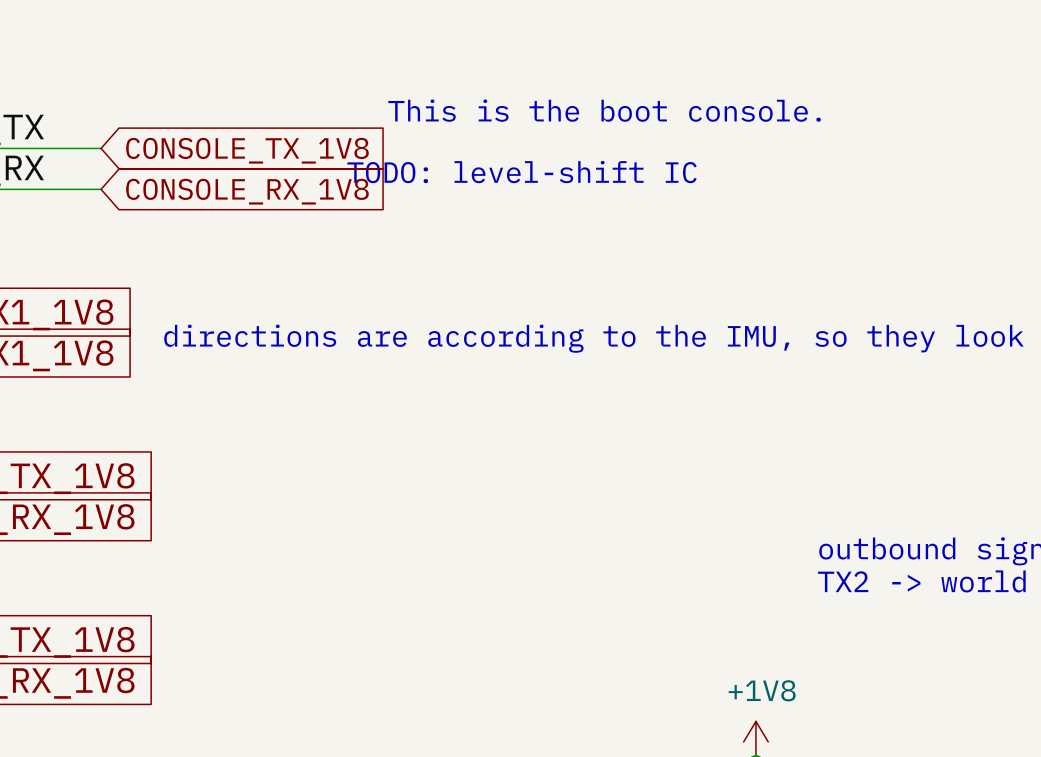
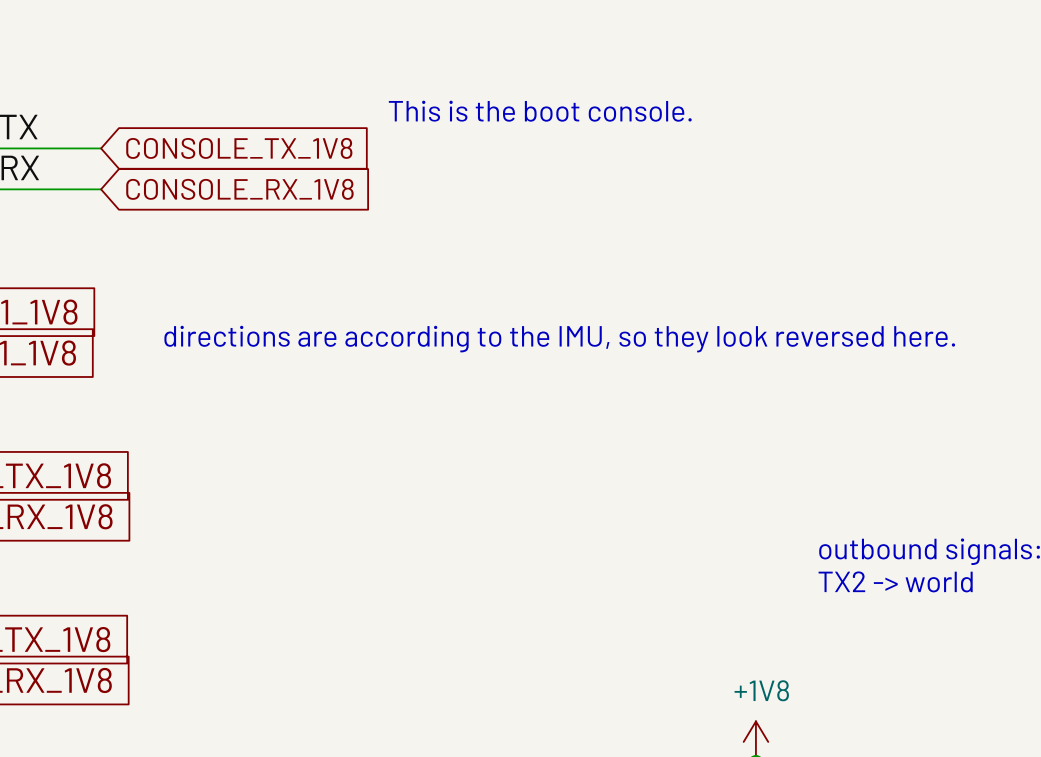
text: TODO: level-shift IC (522, 172) -> none

